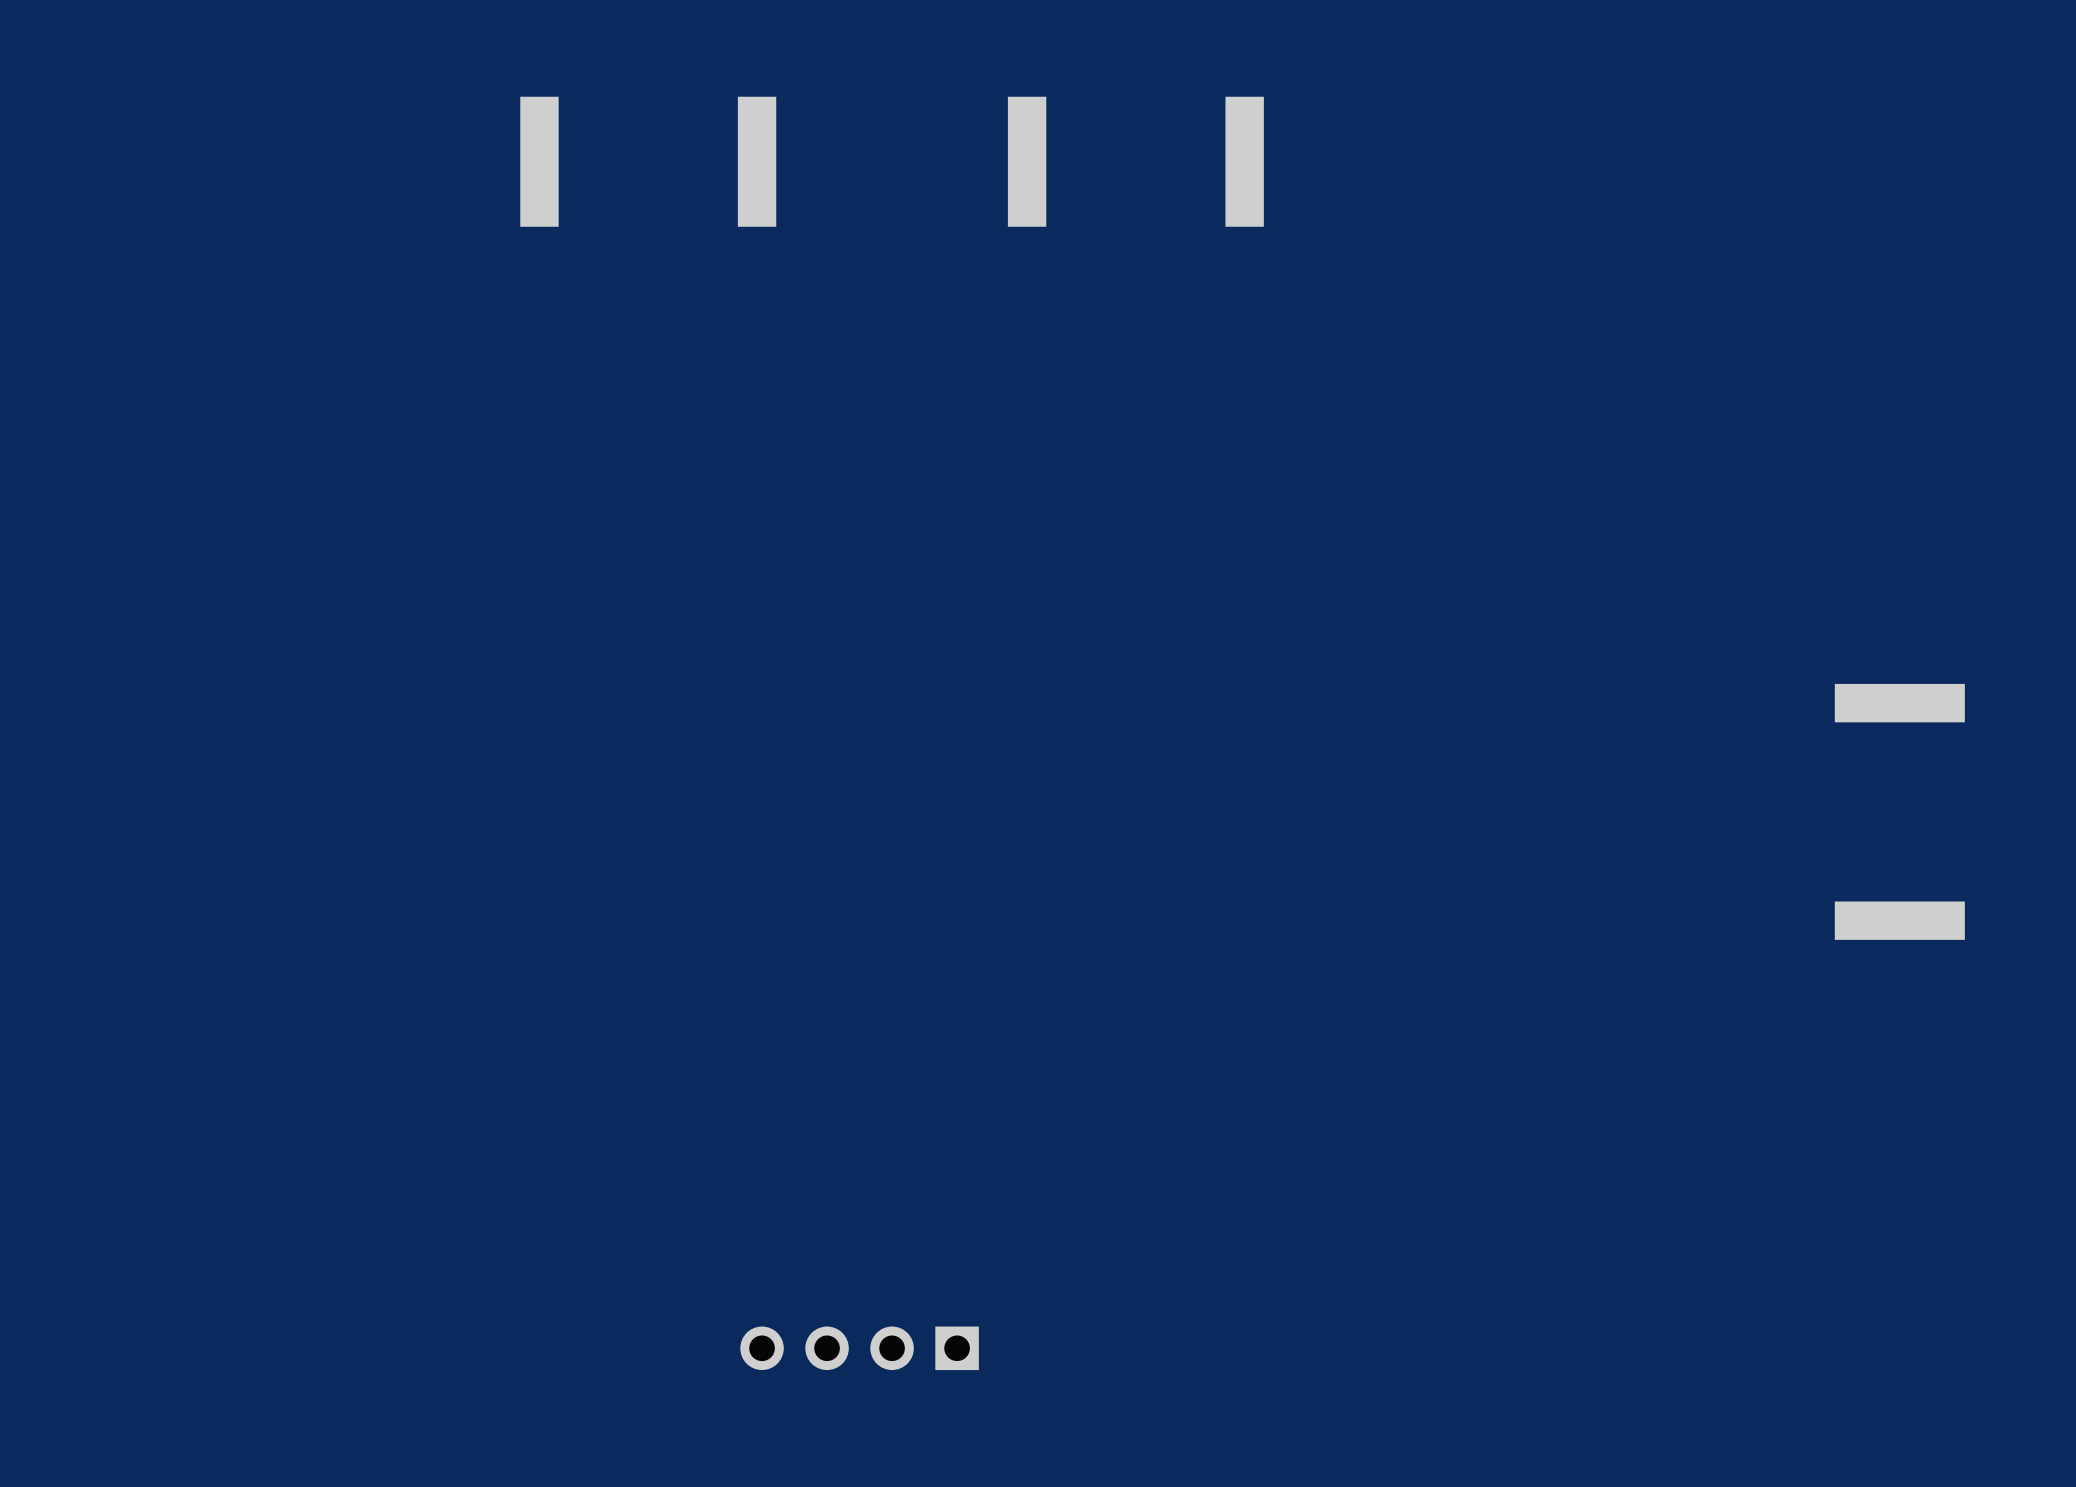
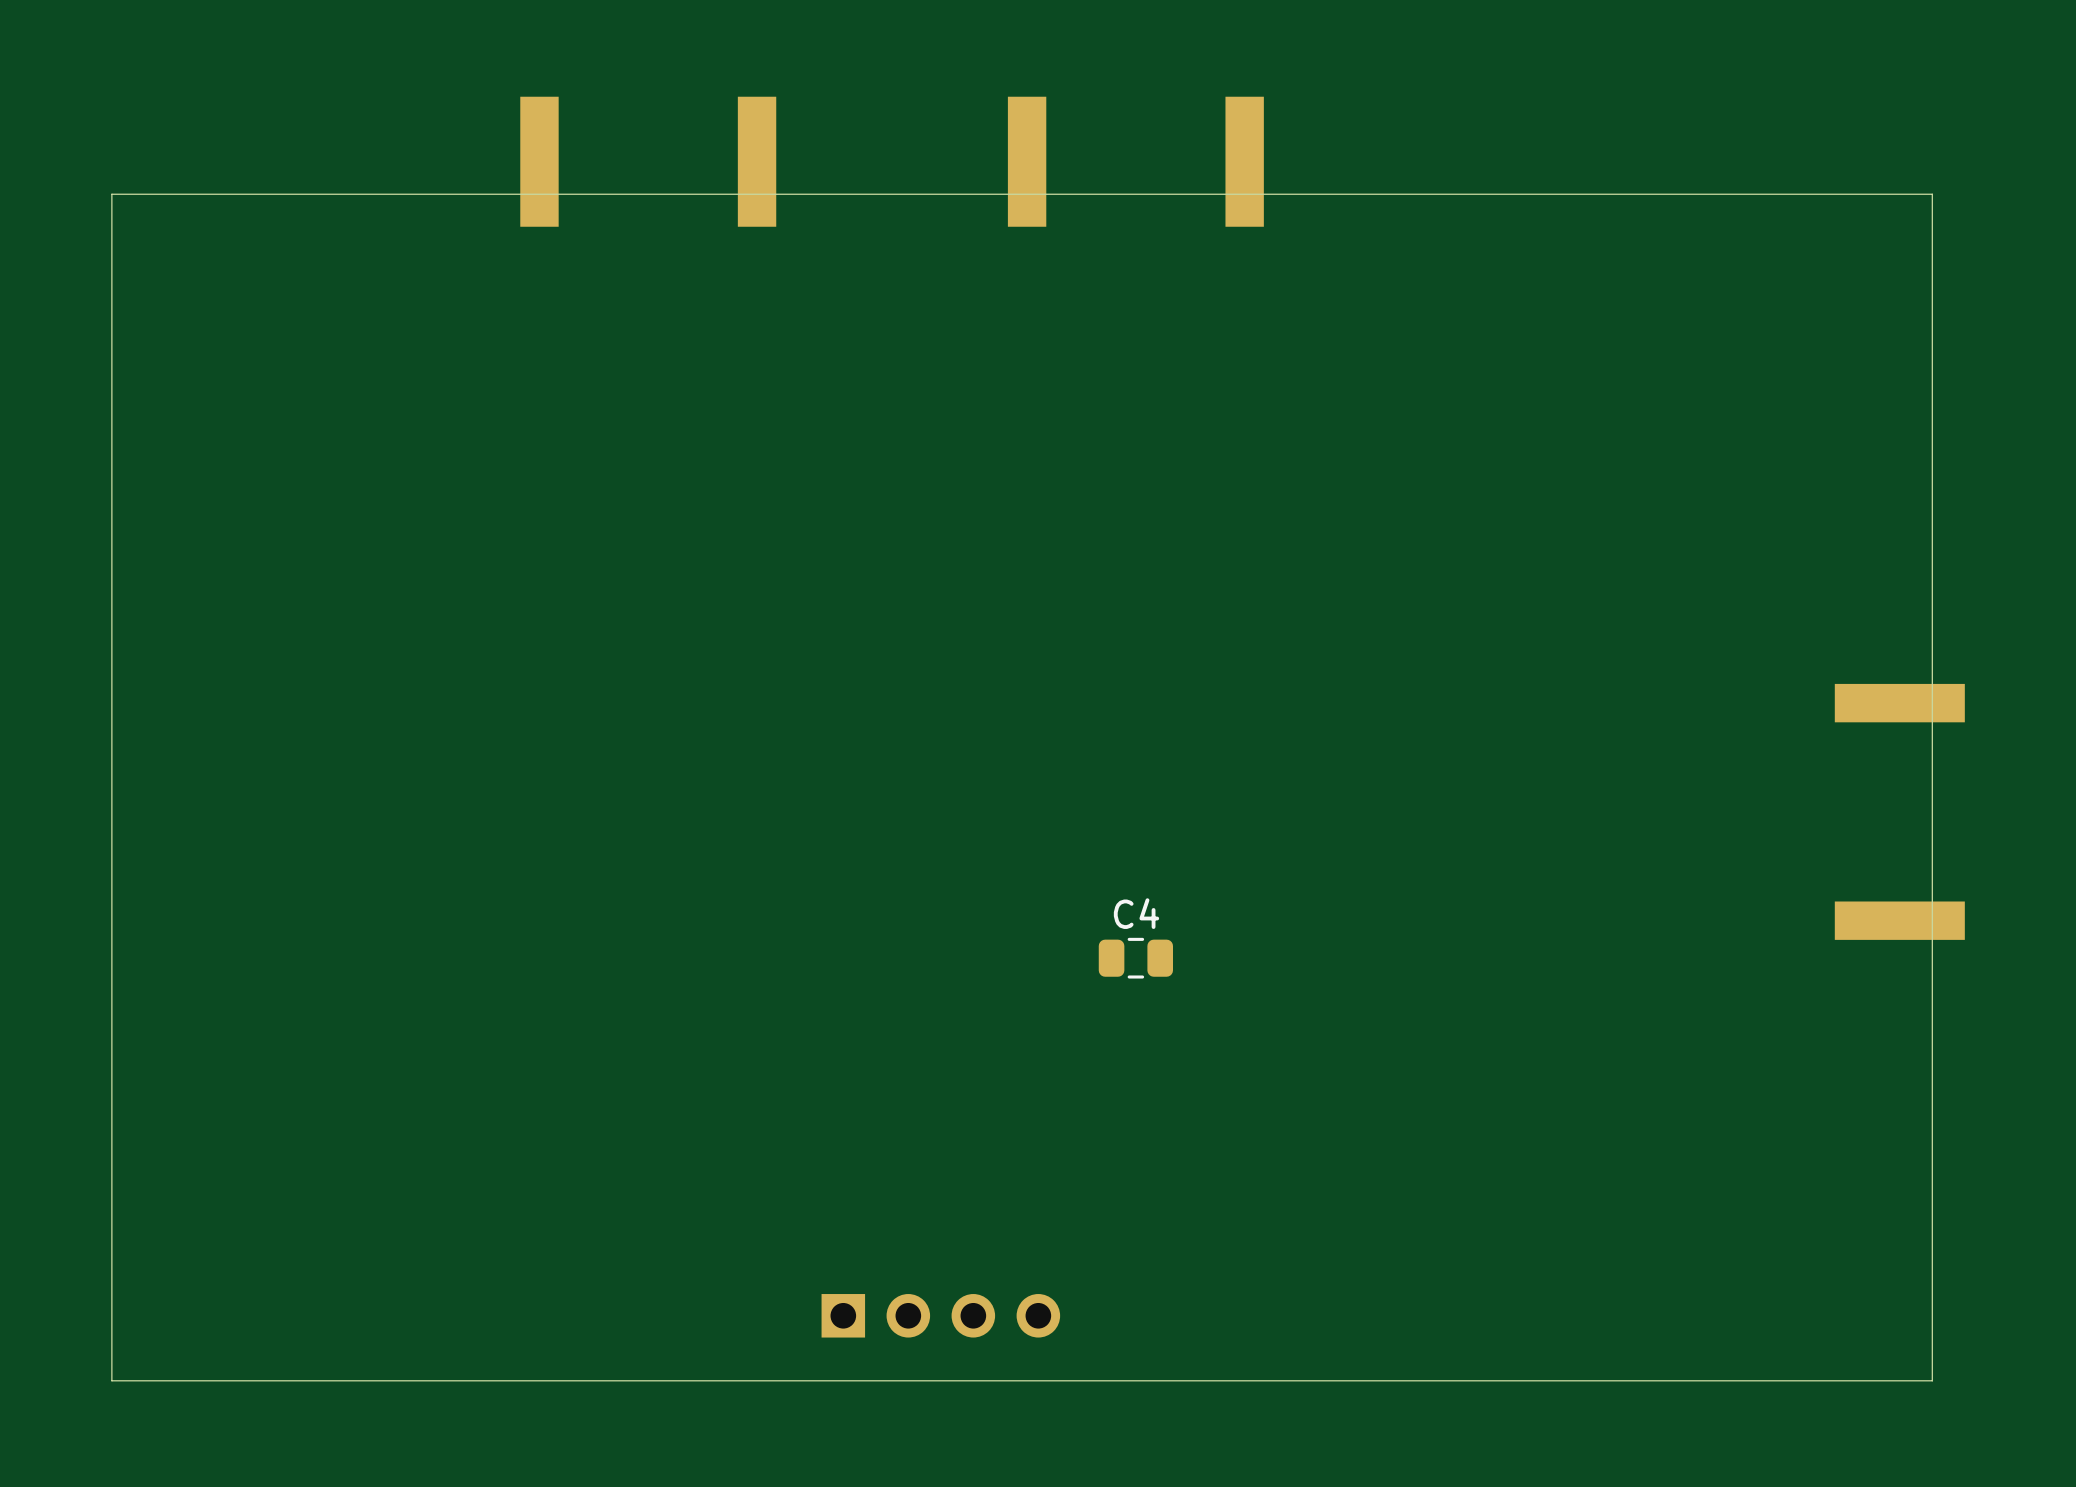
board edge: none -> (1932, 194) (1932, 1380) (111, 1380) (111, 194) (1932, 194)
C4: none -> (1135, 958)
part rotation: 0° (859, 1348) -> 180° (940, 1315)

